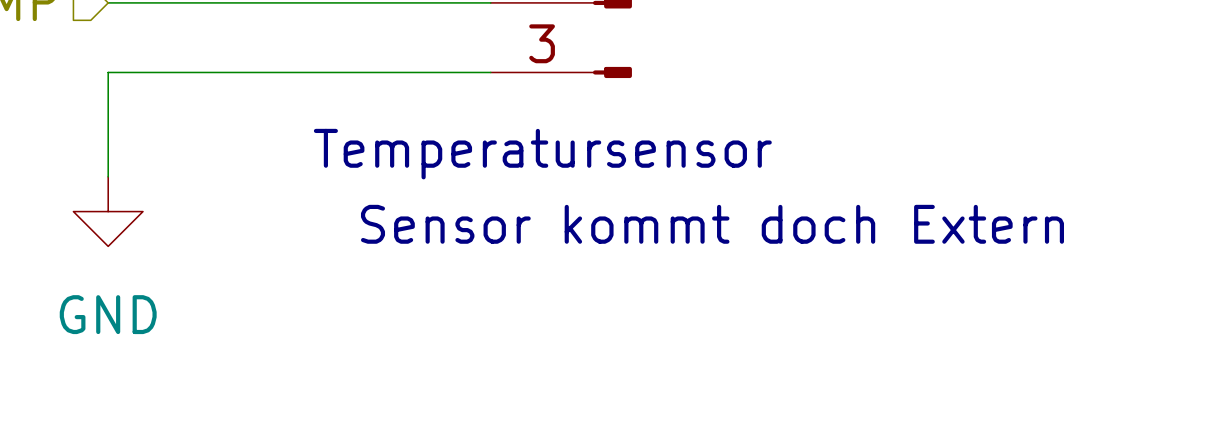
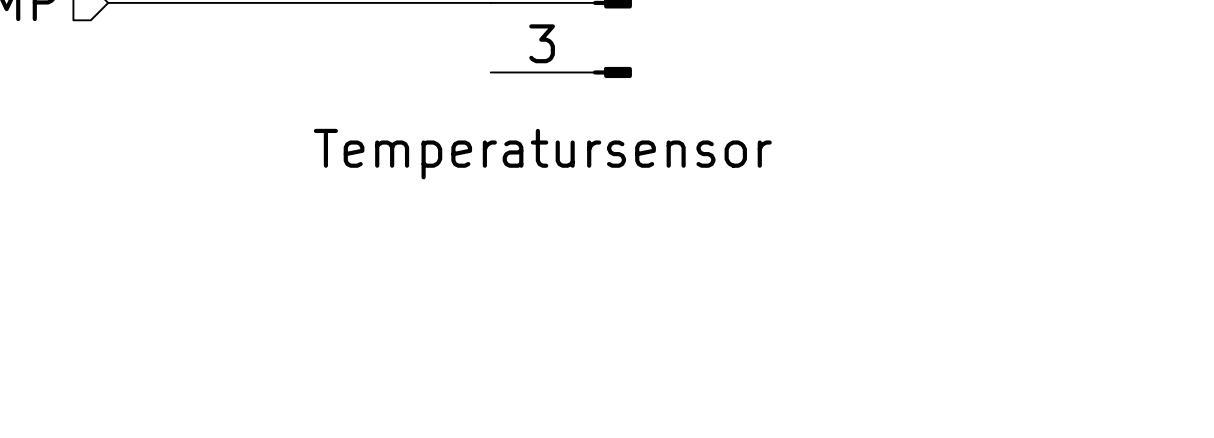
wire: (490, 72) (108, 72) (108, 176) -> none
power symbol: GND (108, 211) -> none
text: Sensor kommt doch Extern (712, 224) -> none

